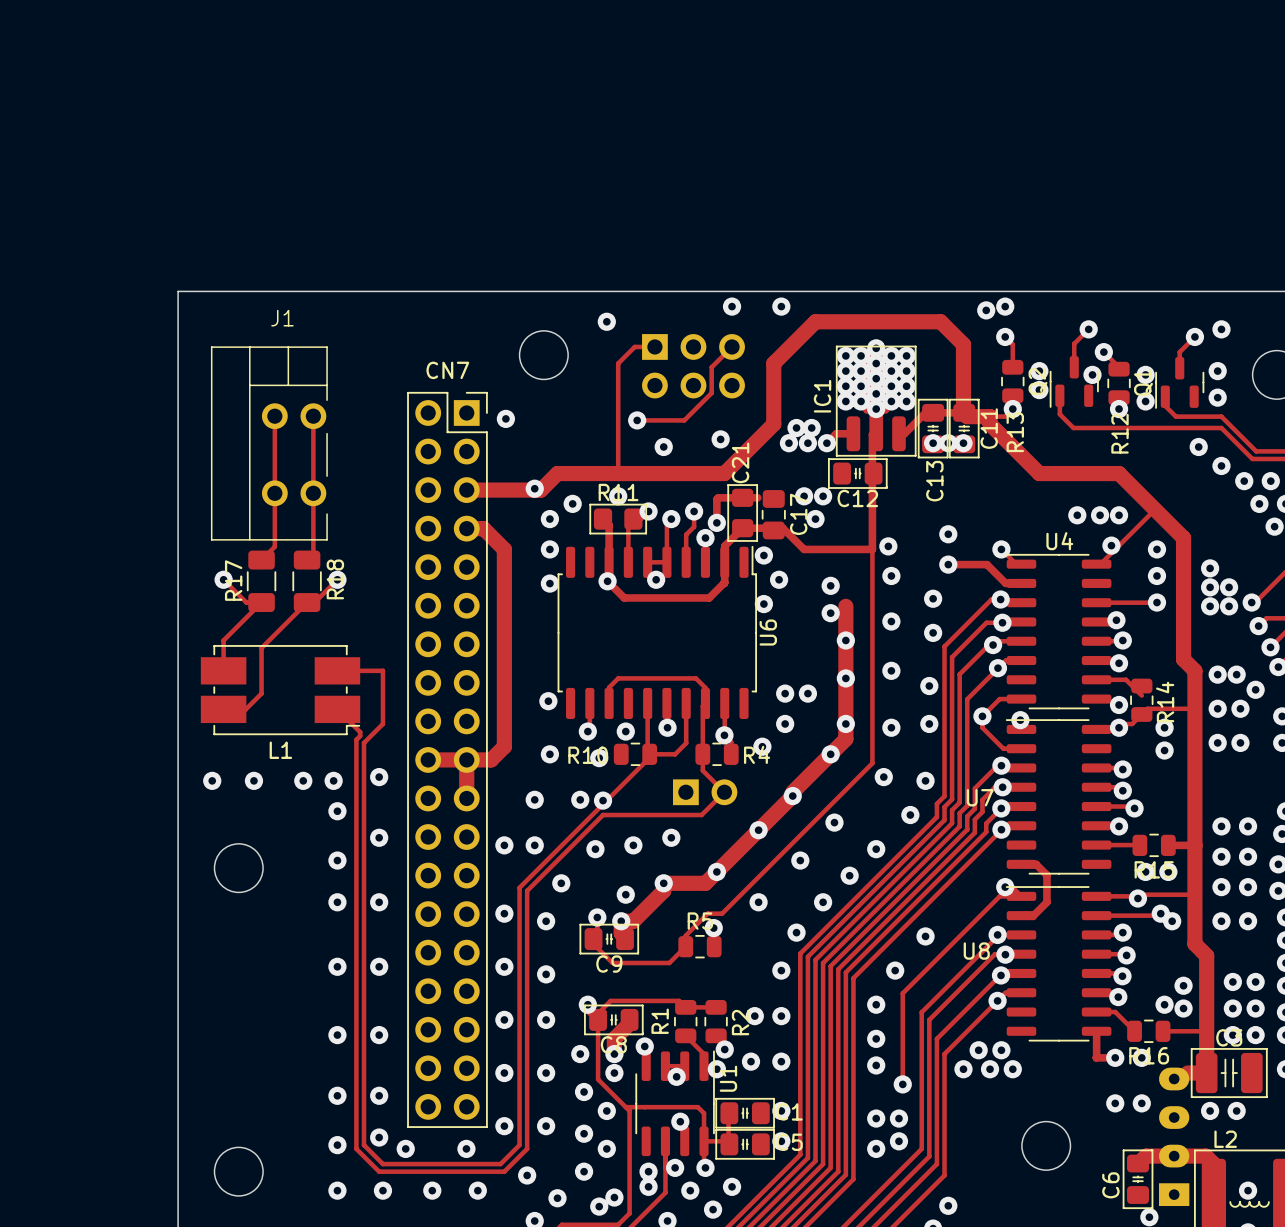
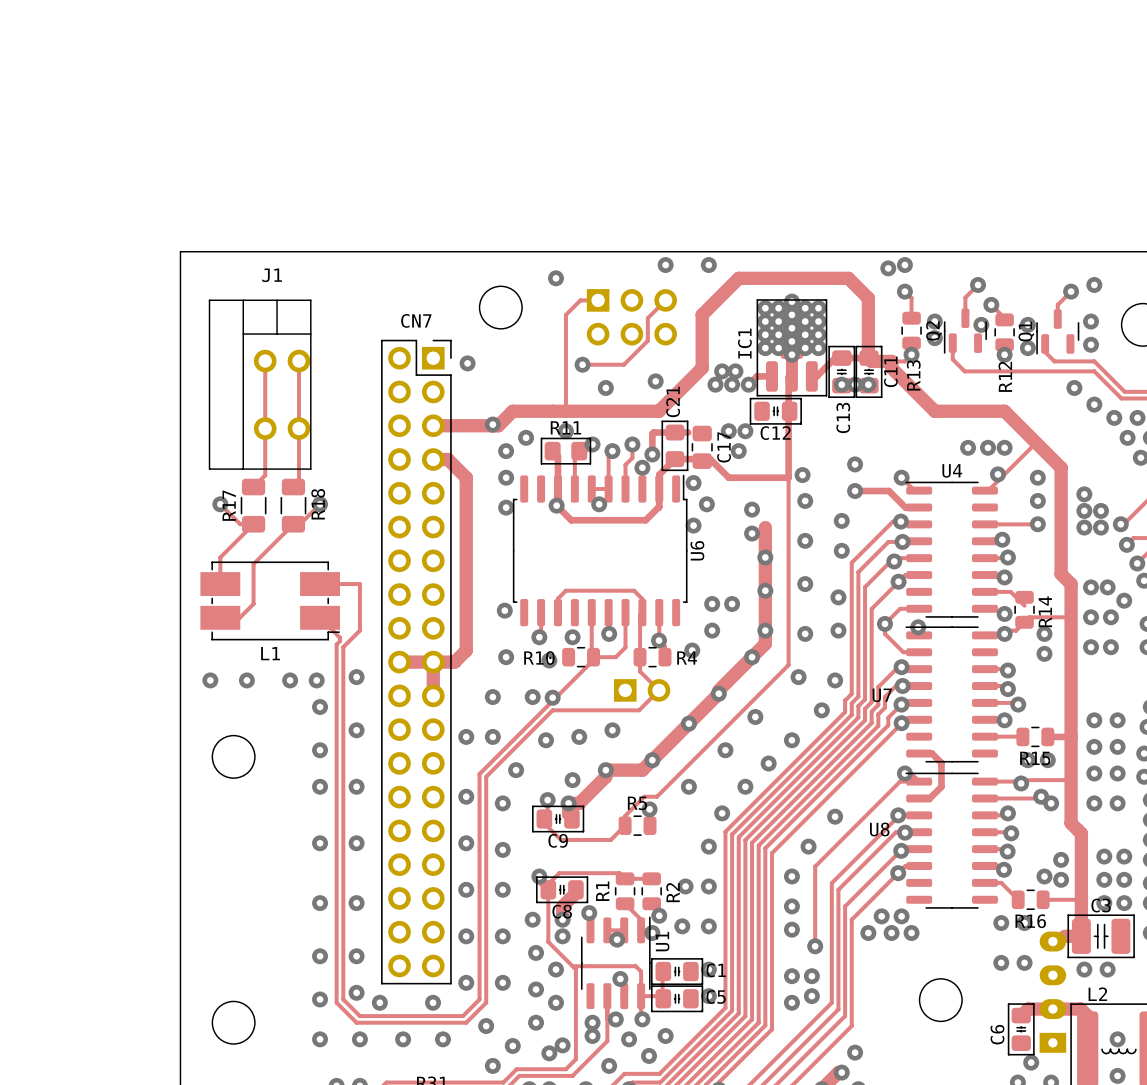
J1 footprint: [210, 346, 328, 541] -> [208, 299, 312, 470]
track: (1096, 1031) (1096, 1057) (1115, 1057) -> none

